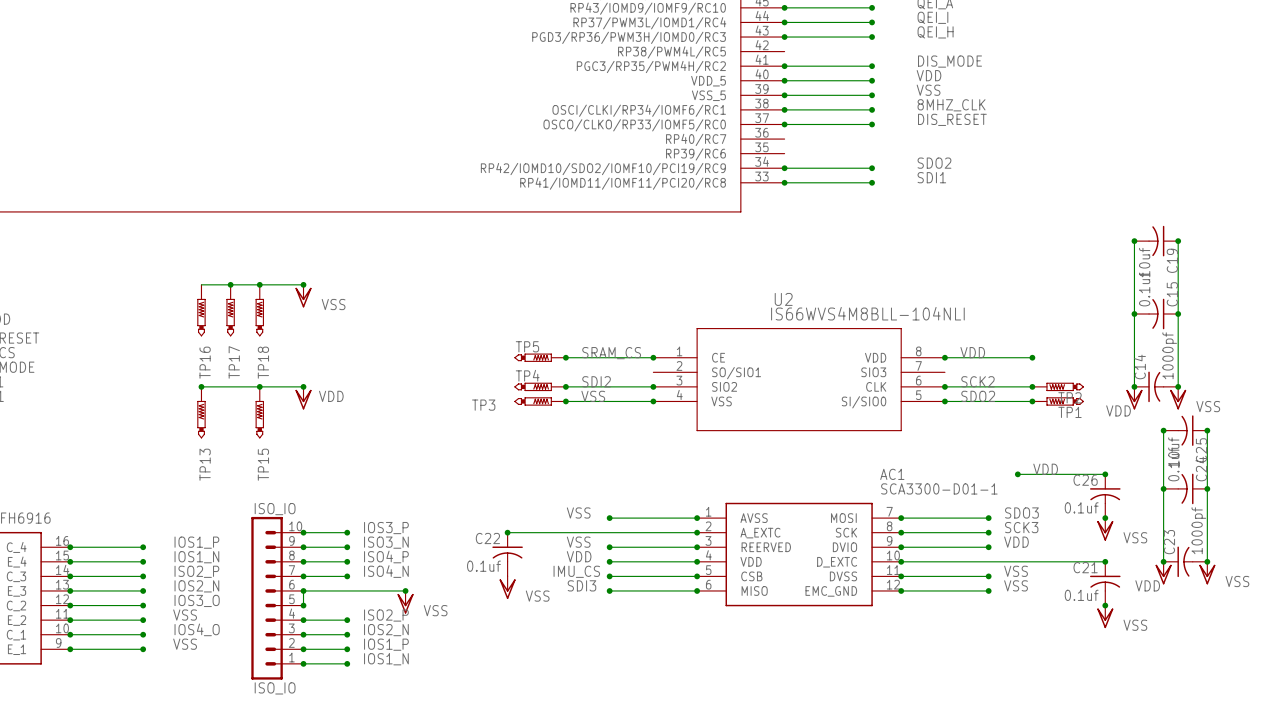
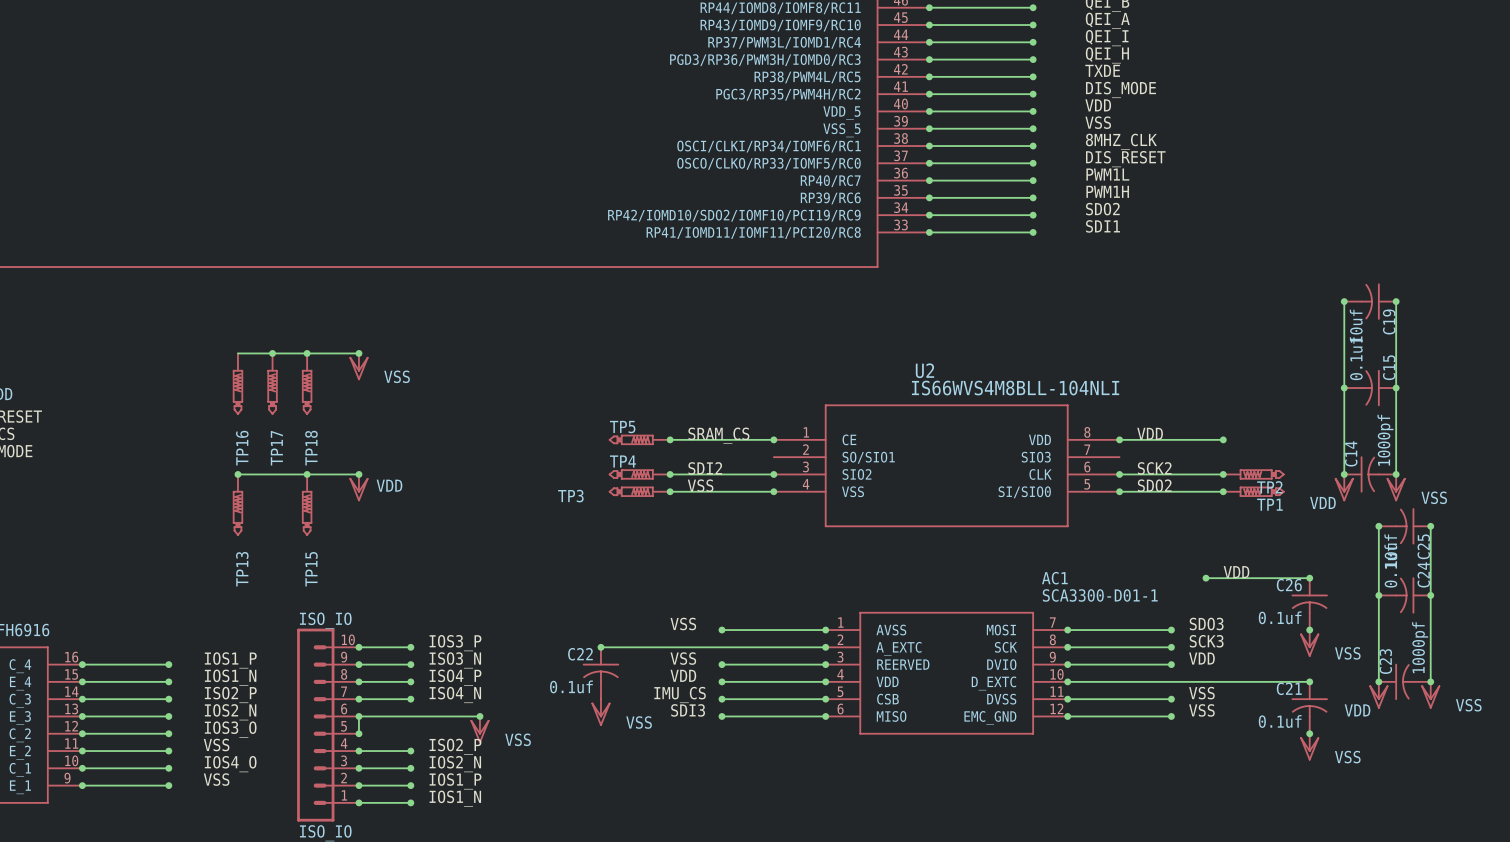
label: none -> TXDE (1102, 70)
wire: none -> (929, 76) (1033, 76)
junction: none -> (929, 76)
junction: none -> (1033, 76)
label: none -> PWM1L (1107, 174)
wire: none -> (929, 180) (1033, 180)
junction: none -> (929, 180)
junction: none -> (1033, 180)
label: none -> PWM1H (1107, 191)
wire: none -> (929, 197) (1033, 197)
junction: none -> (929, 197)
junction: none -> (1033, 197)

